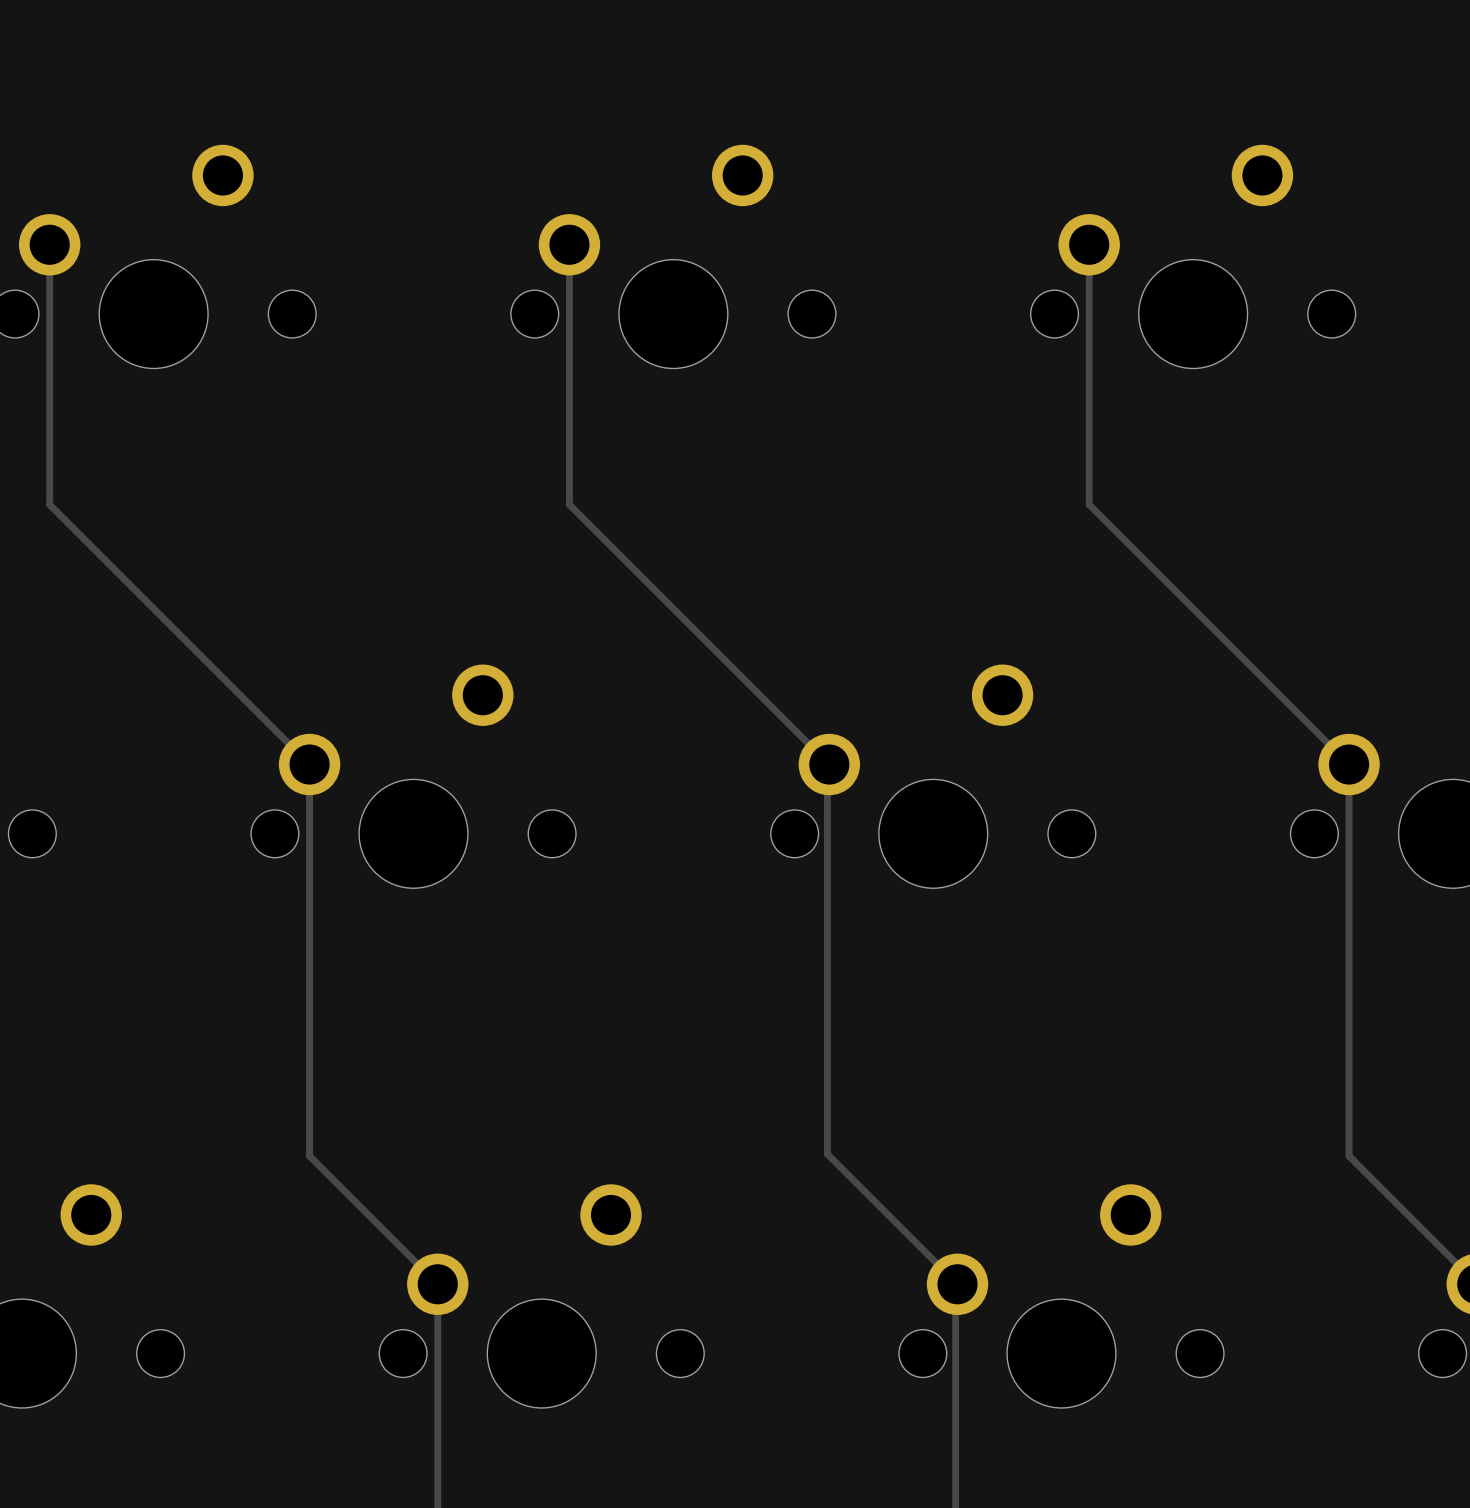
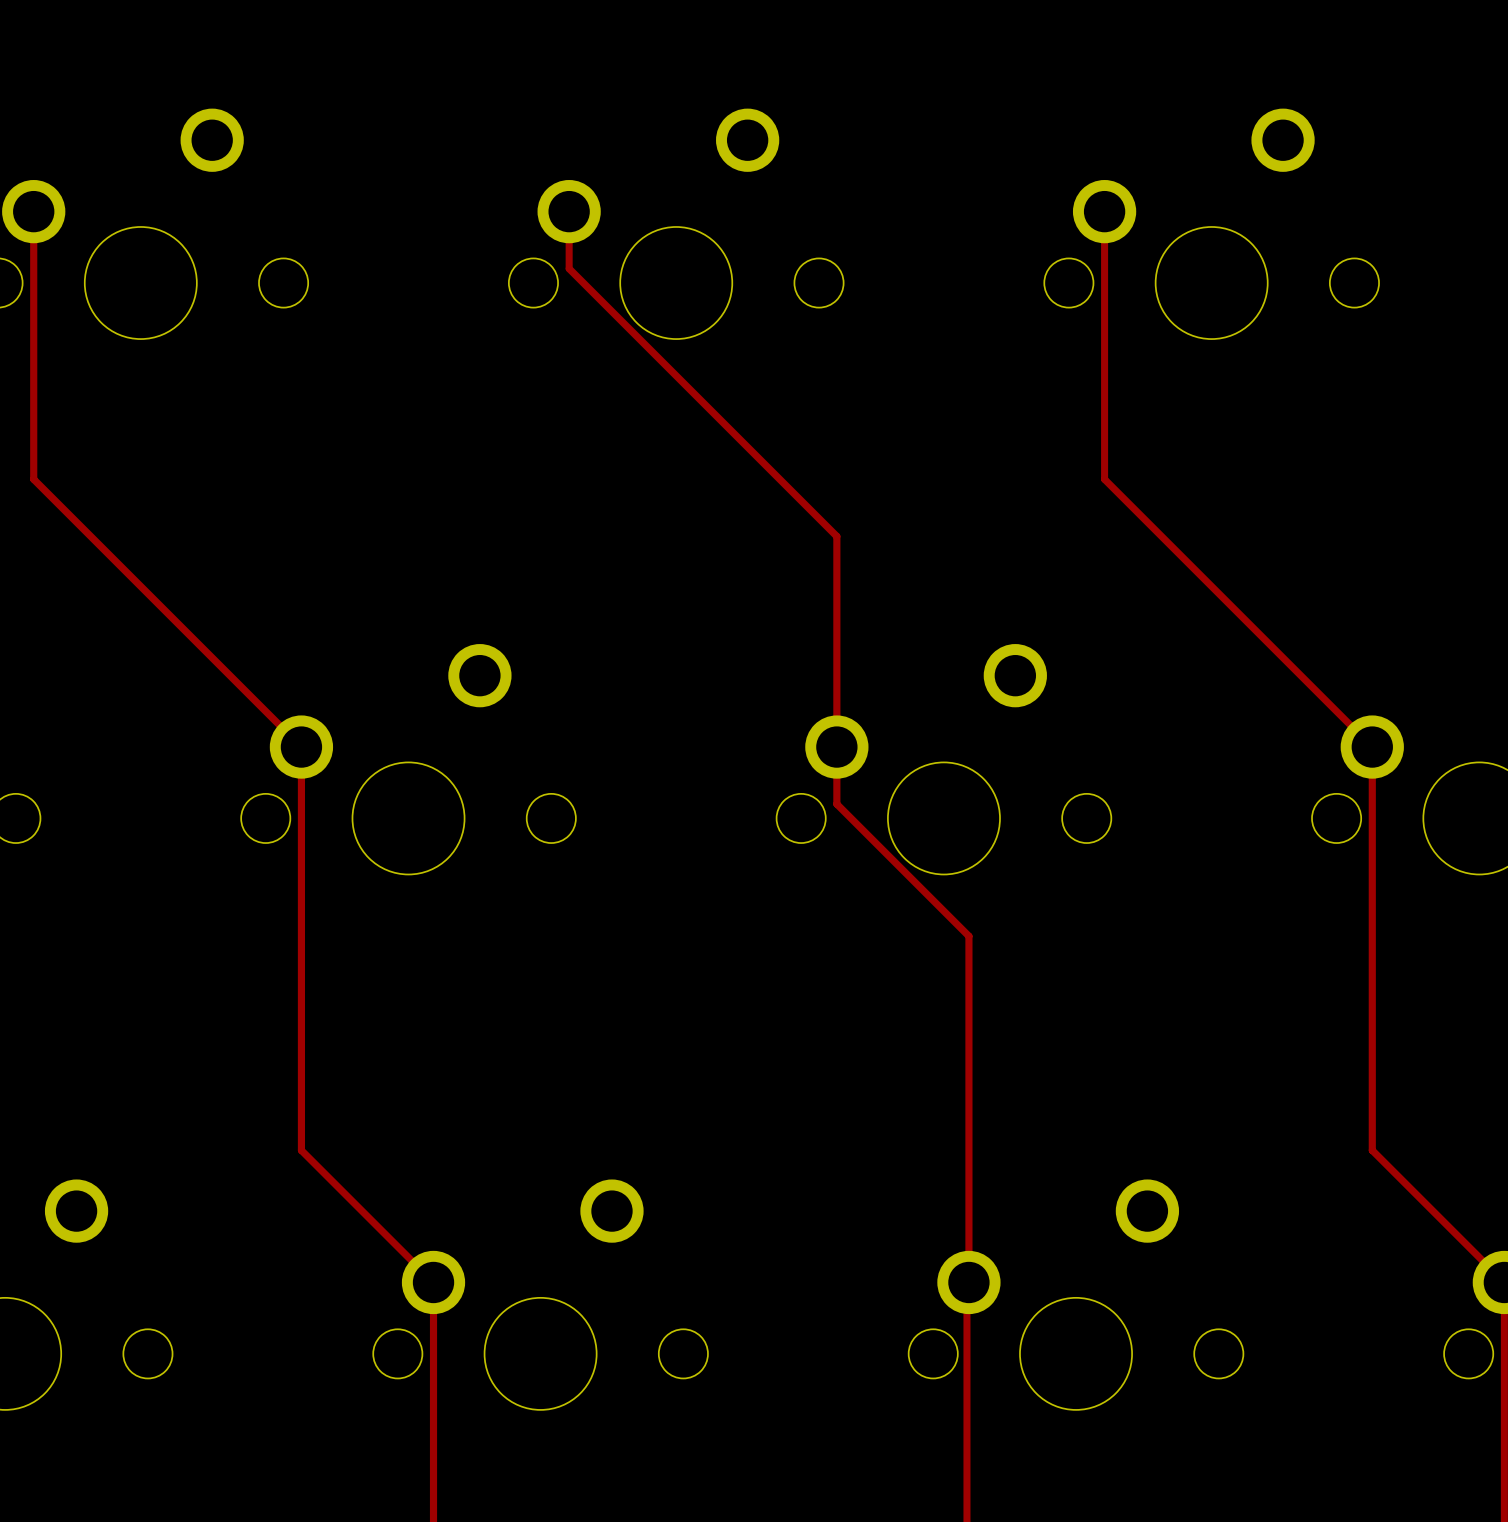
track: (569, 300) (569, 504) (829, 764) (827, 766) (827, 1154) (957, 1284) -> (569, 268) (836, 536) (836, 804) (968, 936) (968, 1282)

